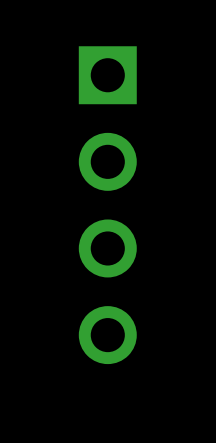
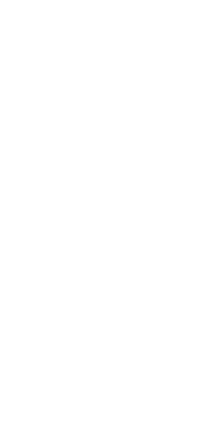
part: (107, 205) -> none

